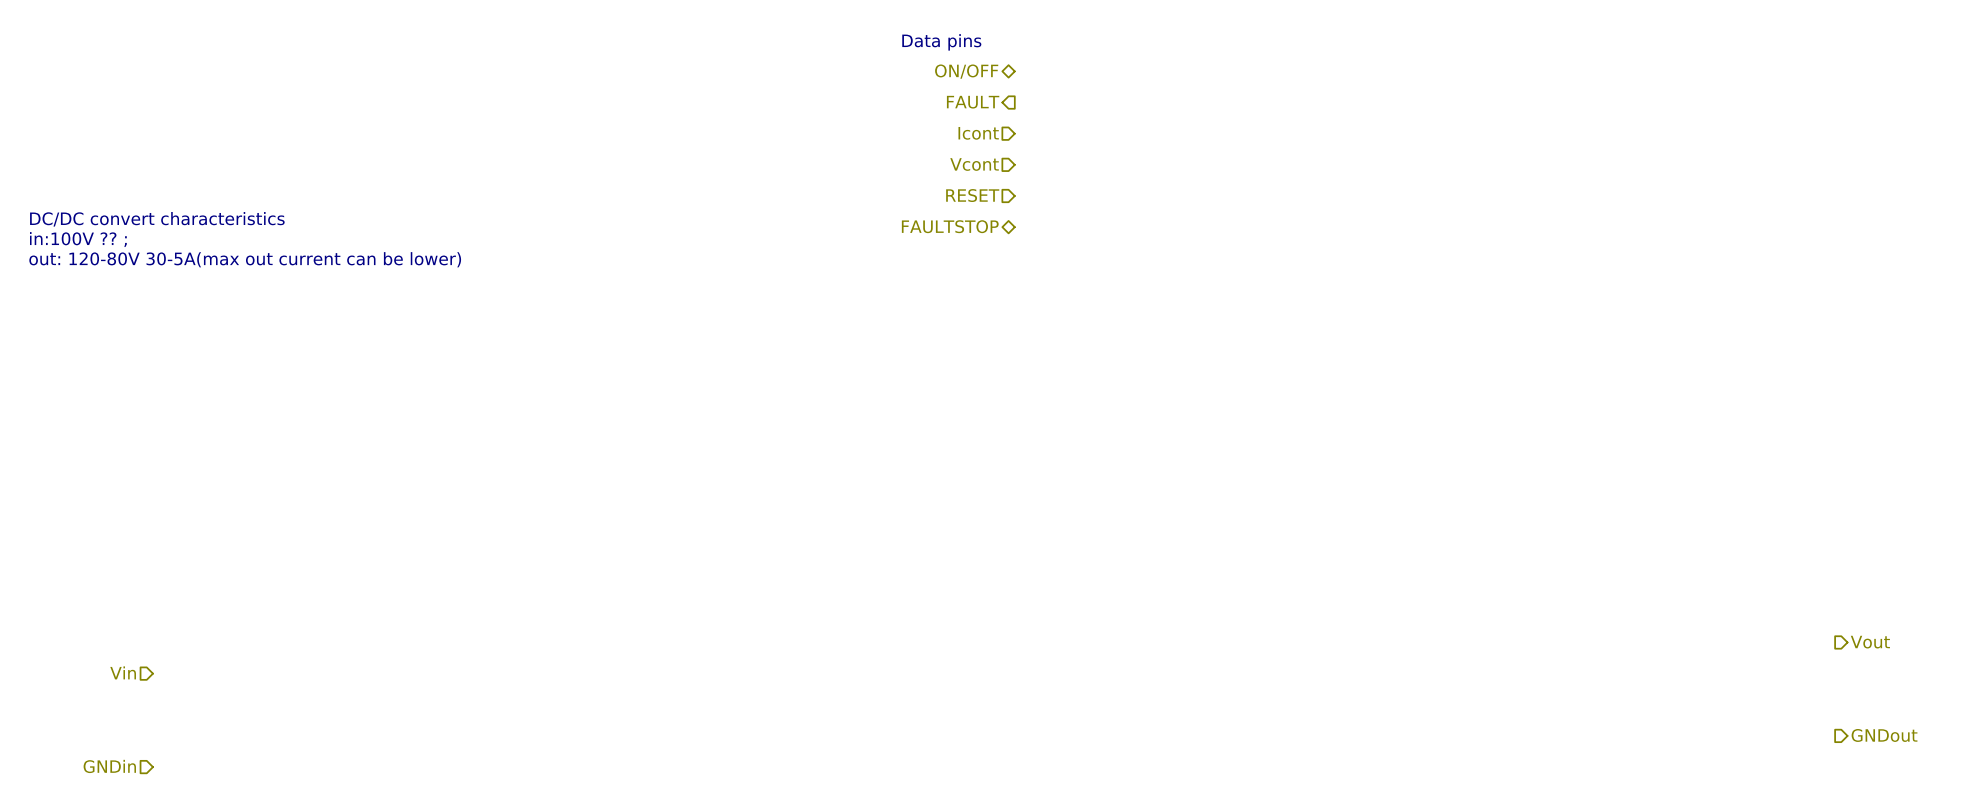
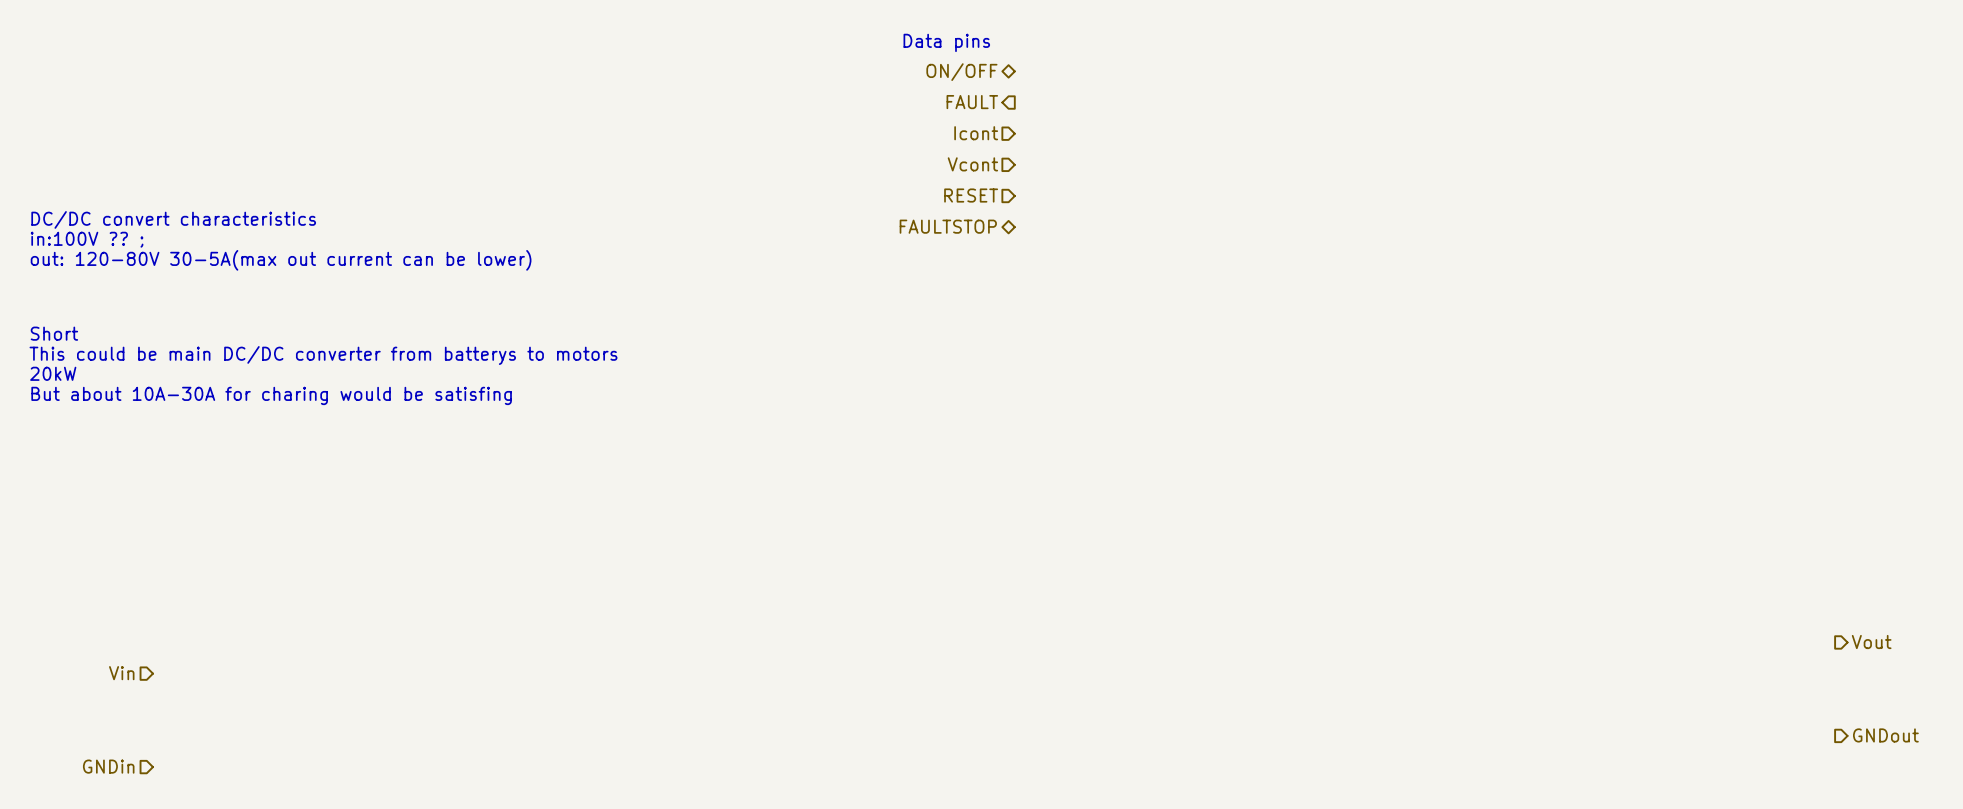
text: none -> Short (54, 333)
text: none -> This could be main DC/DC converter from batterys to motors (323, 355)
text: none -> 20kW (53, 373)
text: none -> But about 10A-30A for charing would be satisfing (271, 395)

